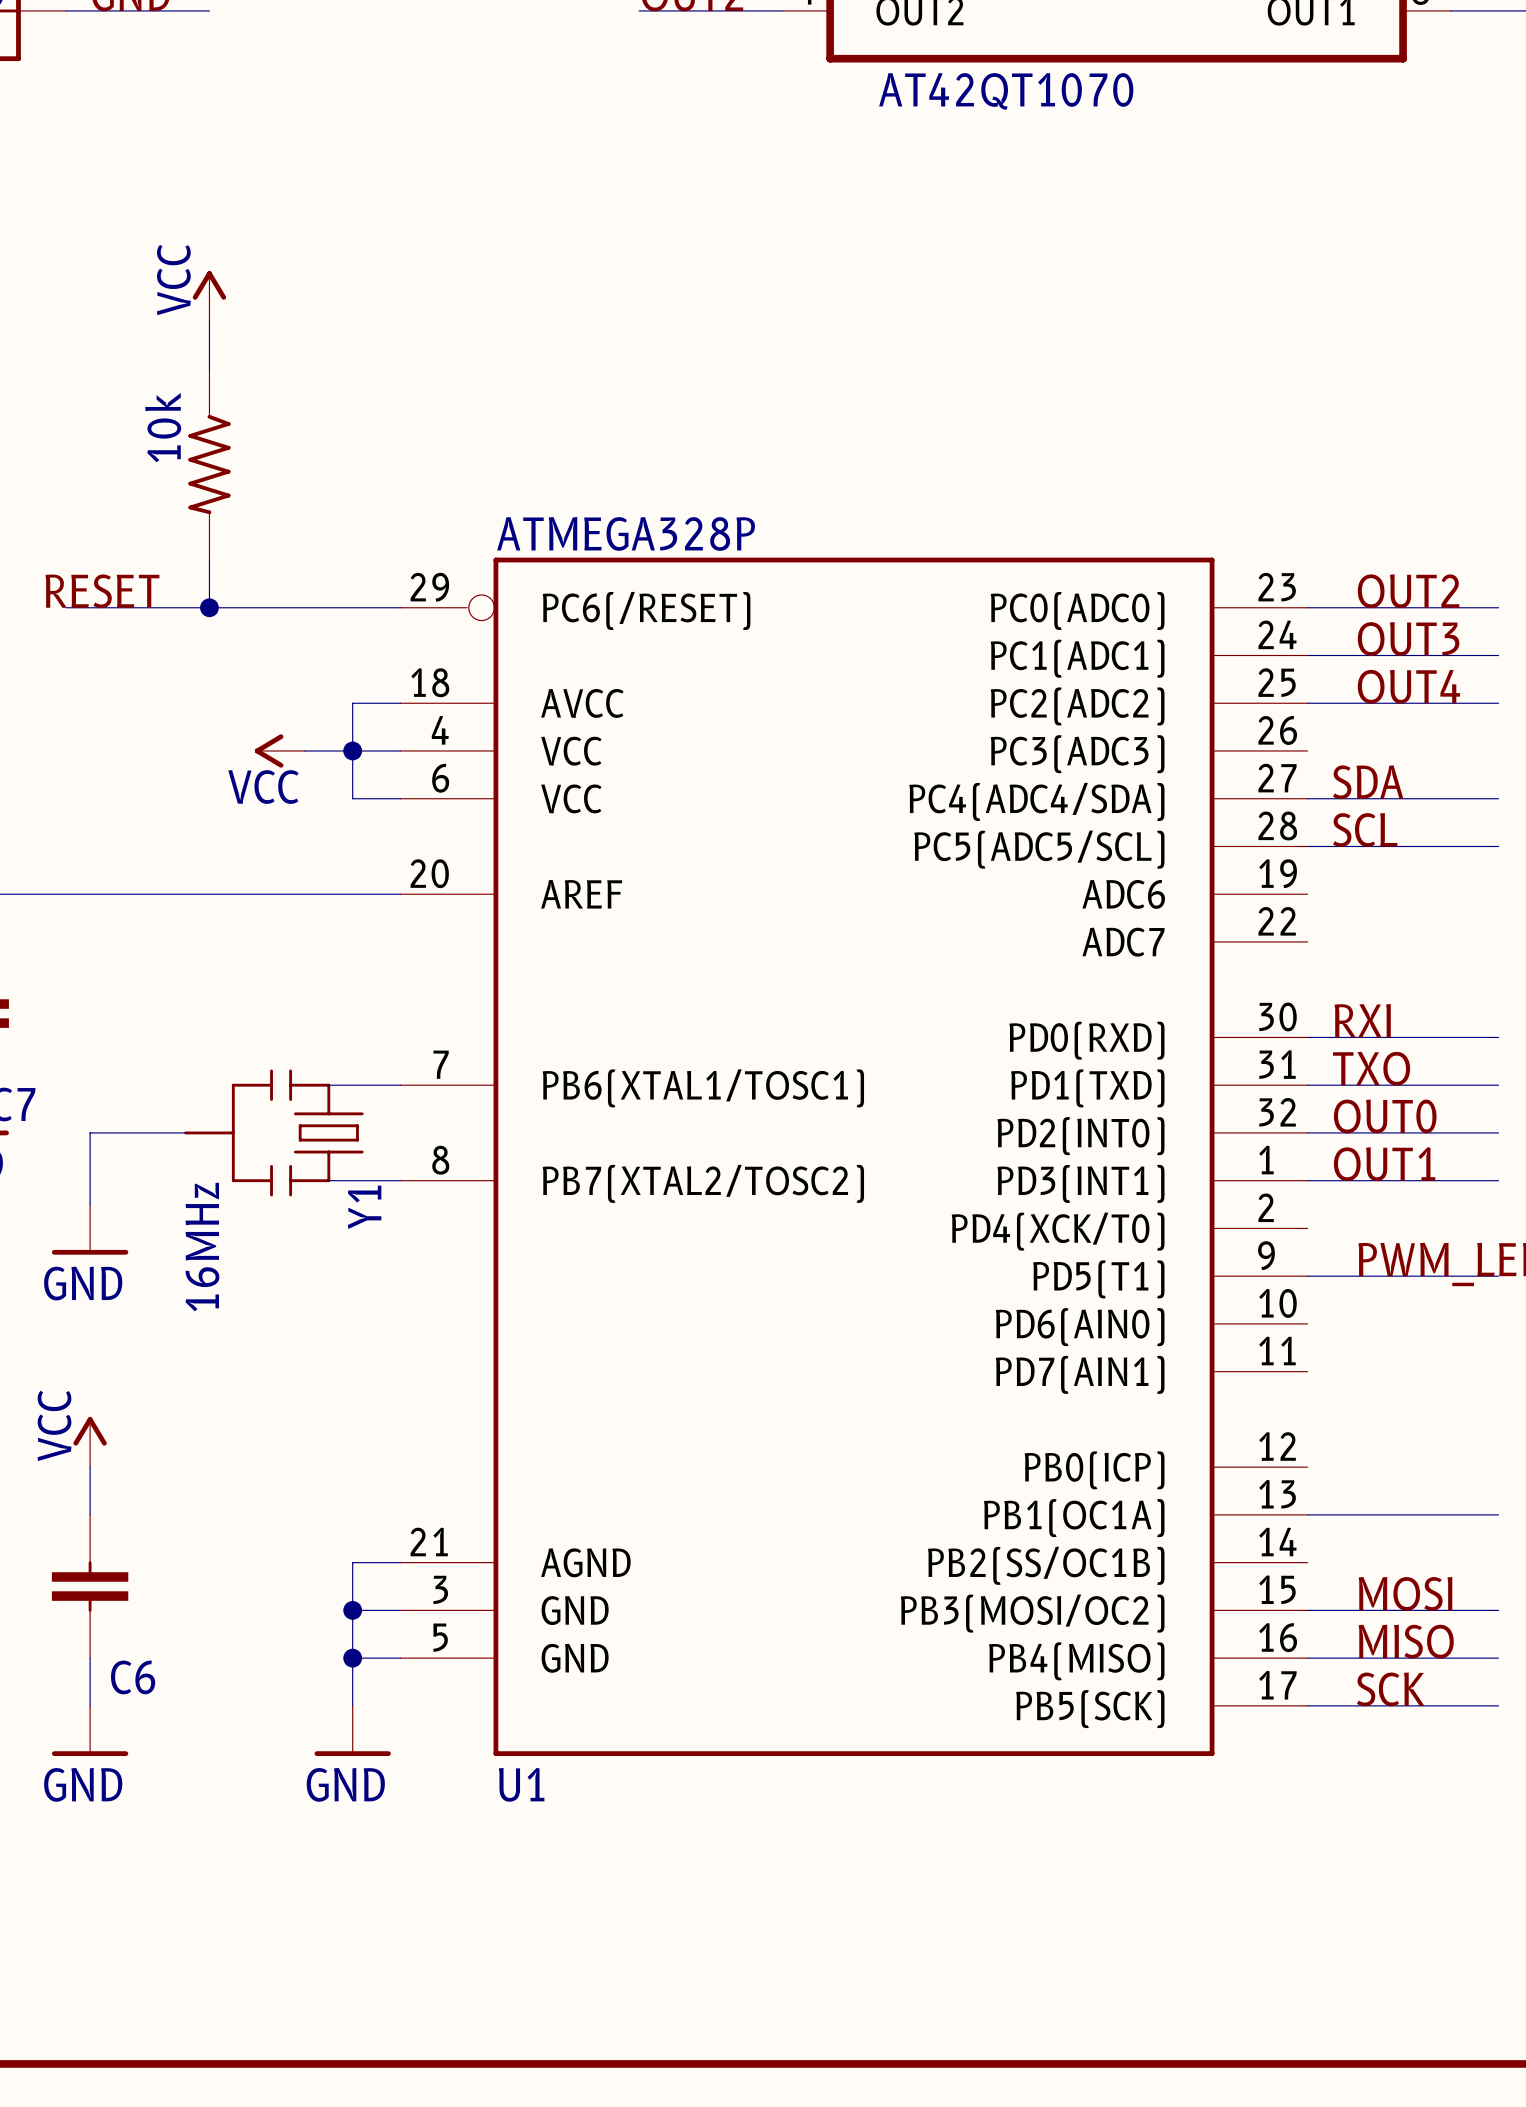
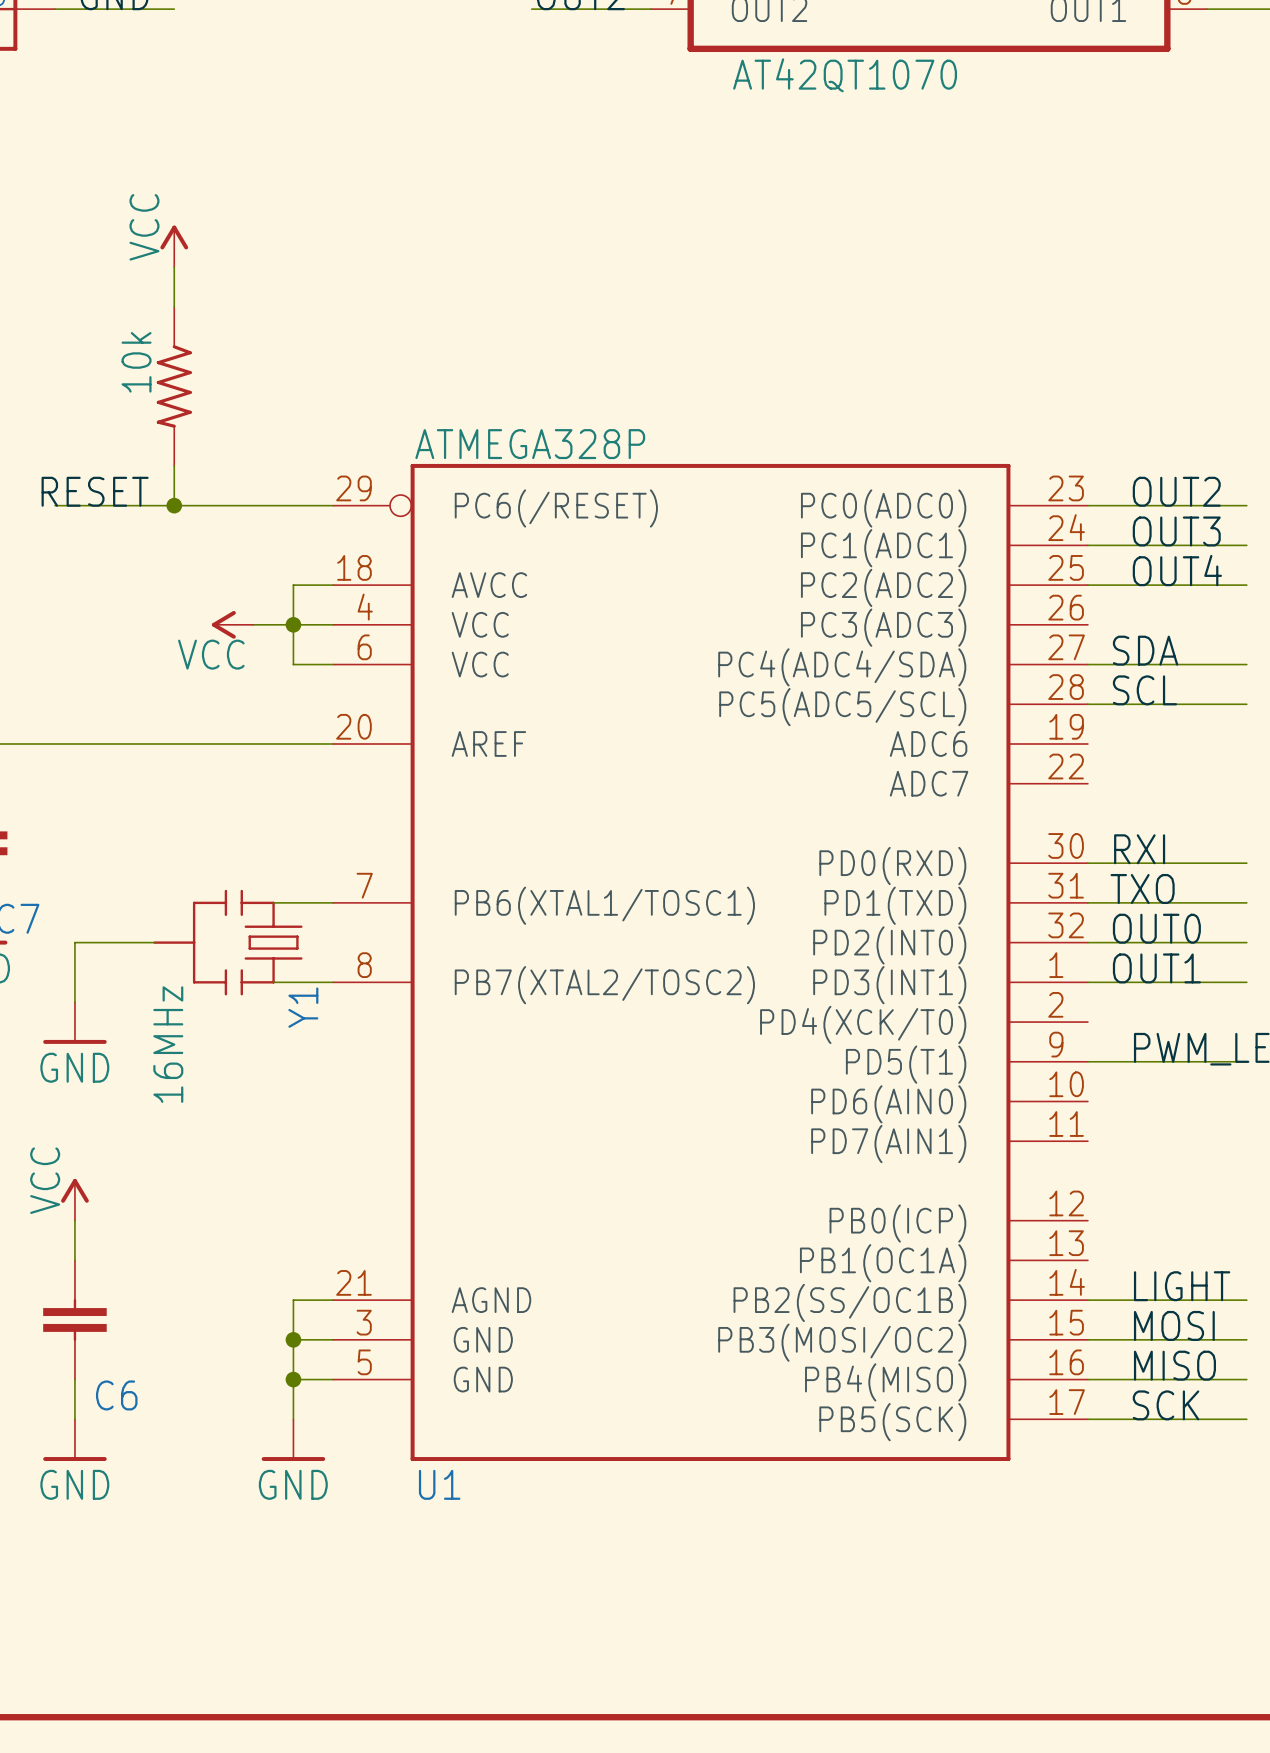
wire: (1307, 1514) (1498, 1514) -> (1087, 1300) (1246, 1300)
label: none -> LIGHT (1182, 1286)

